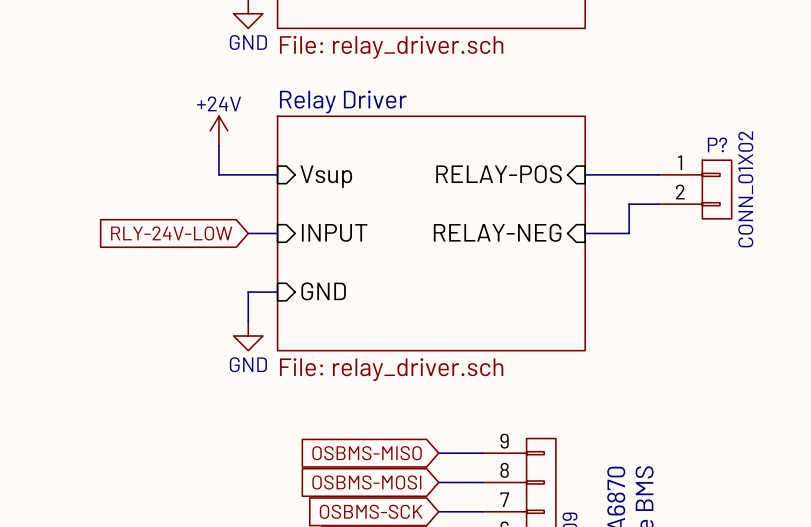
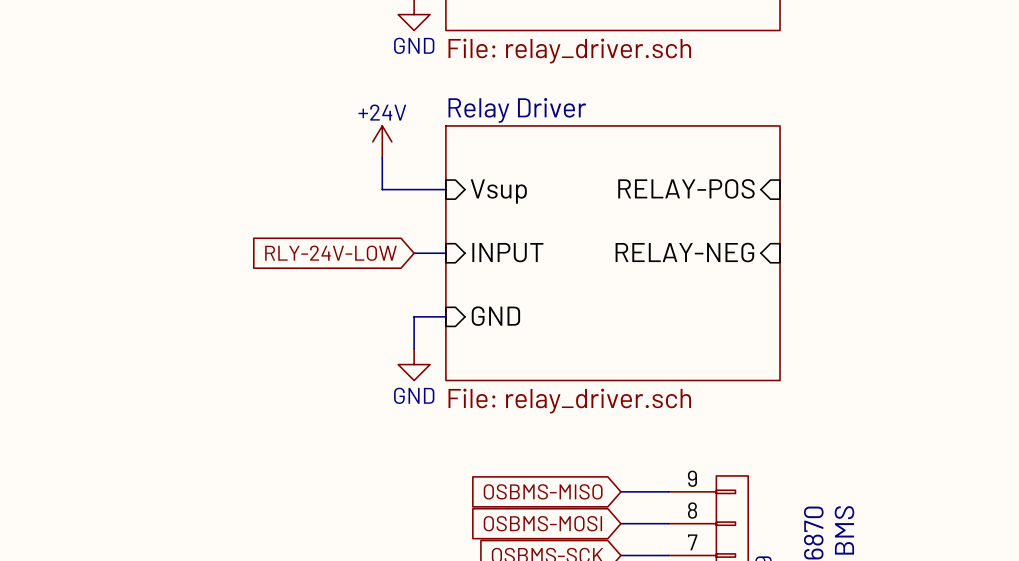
wire: (585, 174) (658, 174) -> none
P?: CONN_01X02 (695, 189) -> none
wire: (658, 204) (629, 204) (629, 233) (585, 233) -> none

